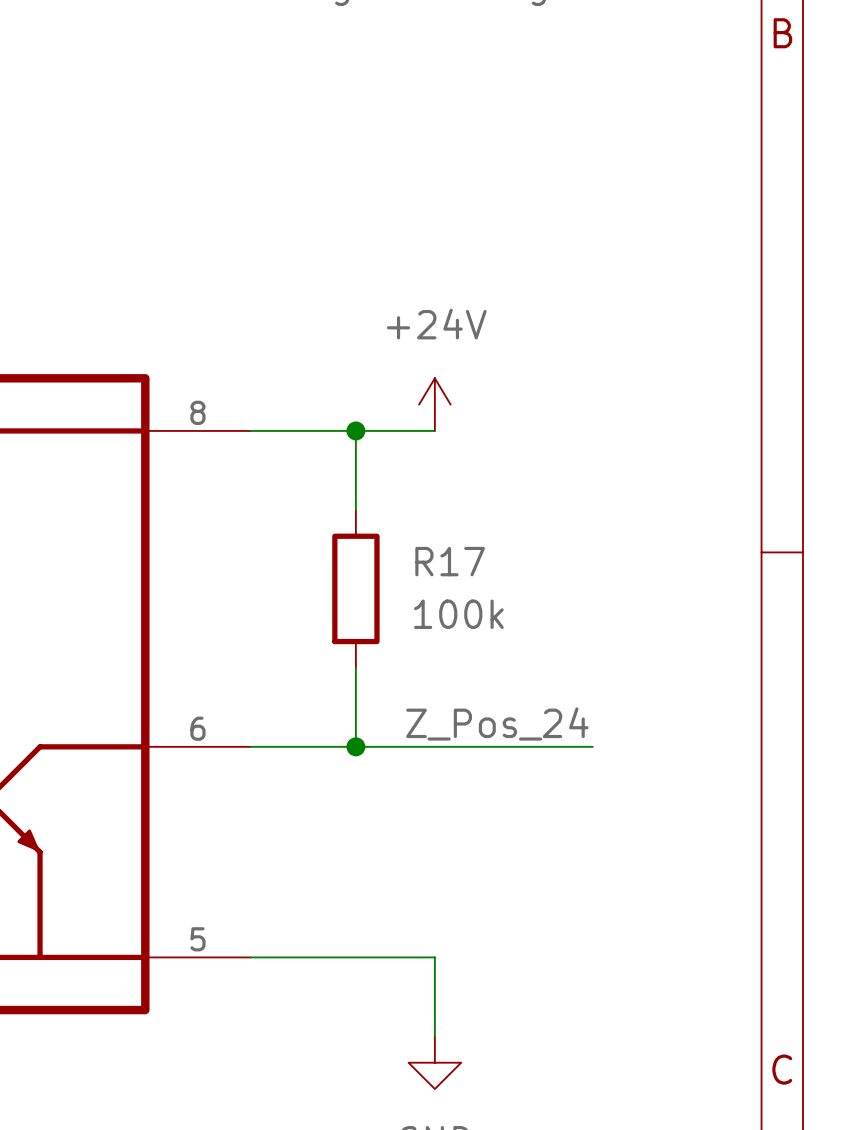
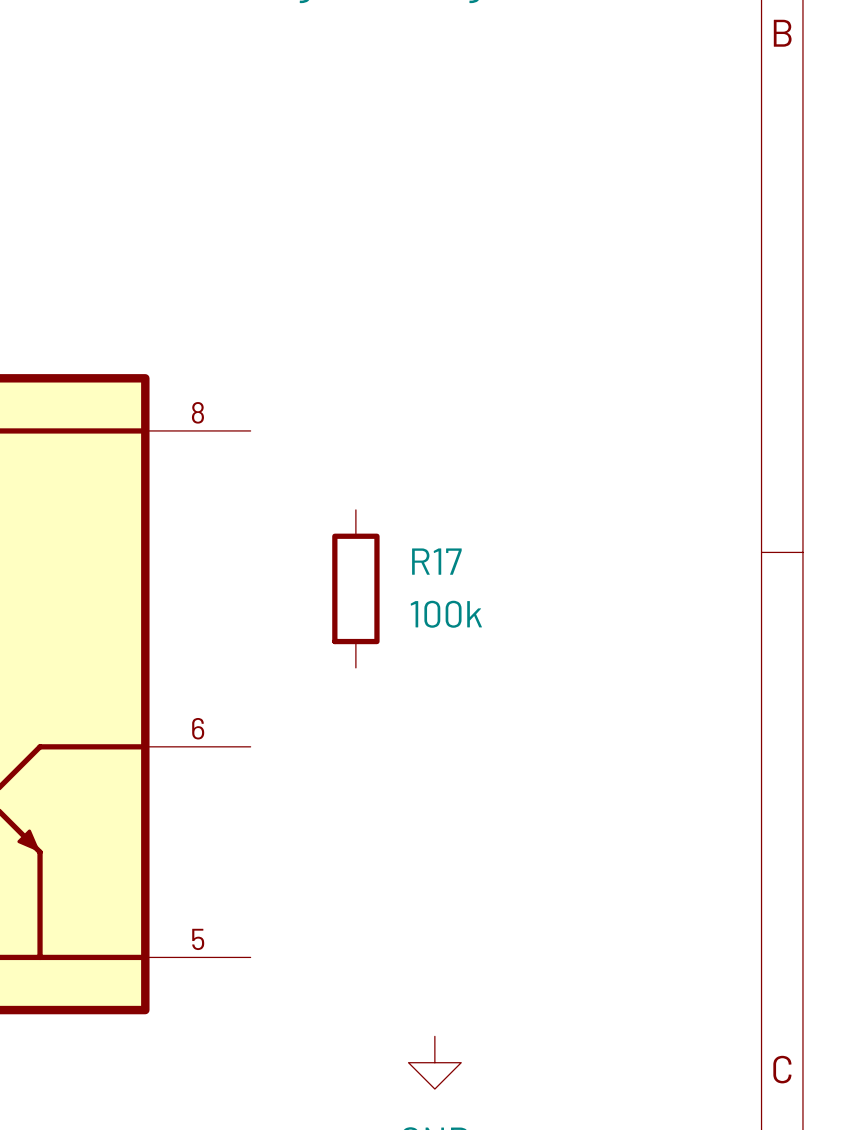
power symbol: +24V (434, 404) -> none
wire: (250, 430) (434, 430) -> none
wire: (355, 430) (355, 509) -> none
junction: (355, 430) -> none
wire: (355, 667) (355, 746) -> none
label: Z_Pos_24 (497, 723) -> none
wire: (250, 746) (592, 746) -> none
junction: (355, 746) -> none
wire: (250, 957) (434, 957) (434, 1036) -> none

